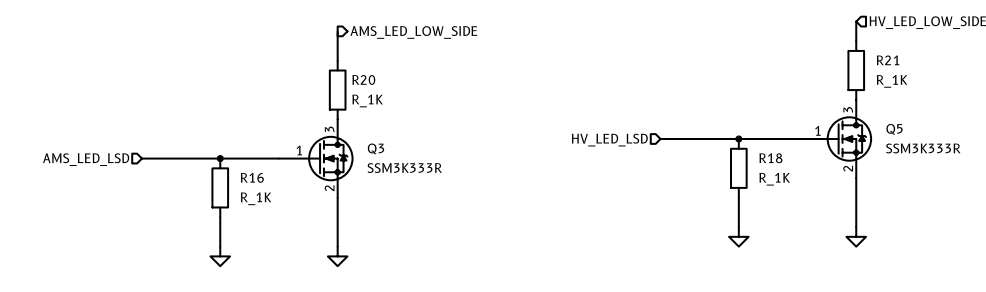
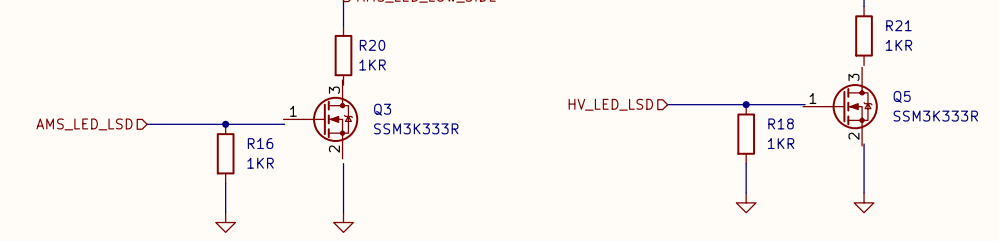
R21 value: R_1K (892, 81) -> 1KR (898, 45)
Q5 symbol: [797, 99, 873, 179] -> [803, 67, 878, 146]
R20 value: R_1K (367, 100) -> 1KR (372, 65)
Q3 symbol: [278, 119, 354, 198] -> [283, 80, 359, 159]
R18 value: R_1K (774, 179) -> 1KR (781, 143)
R16 value: R_1K (256, 198) -> 1KR (260, 163)

